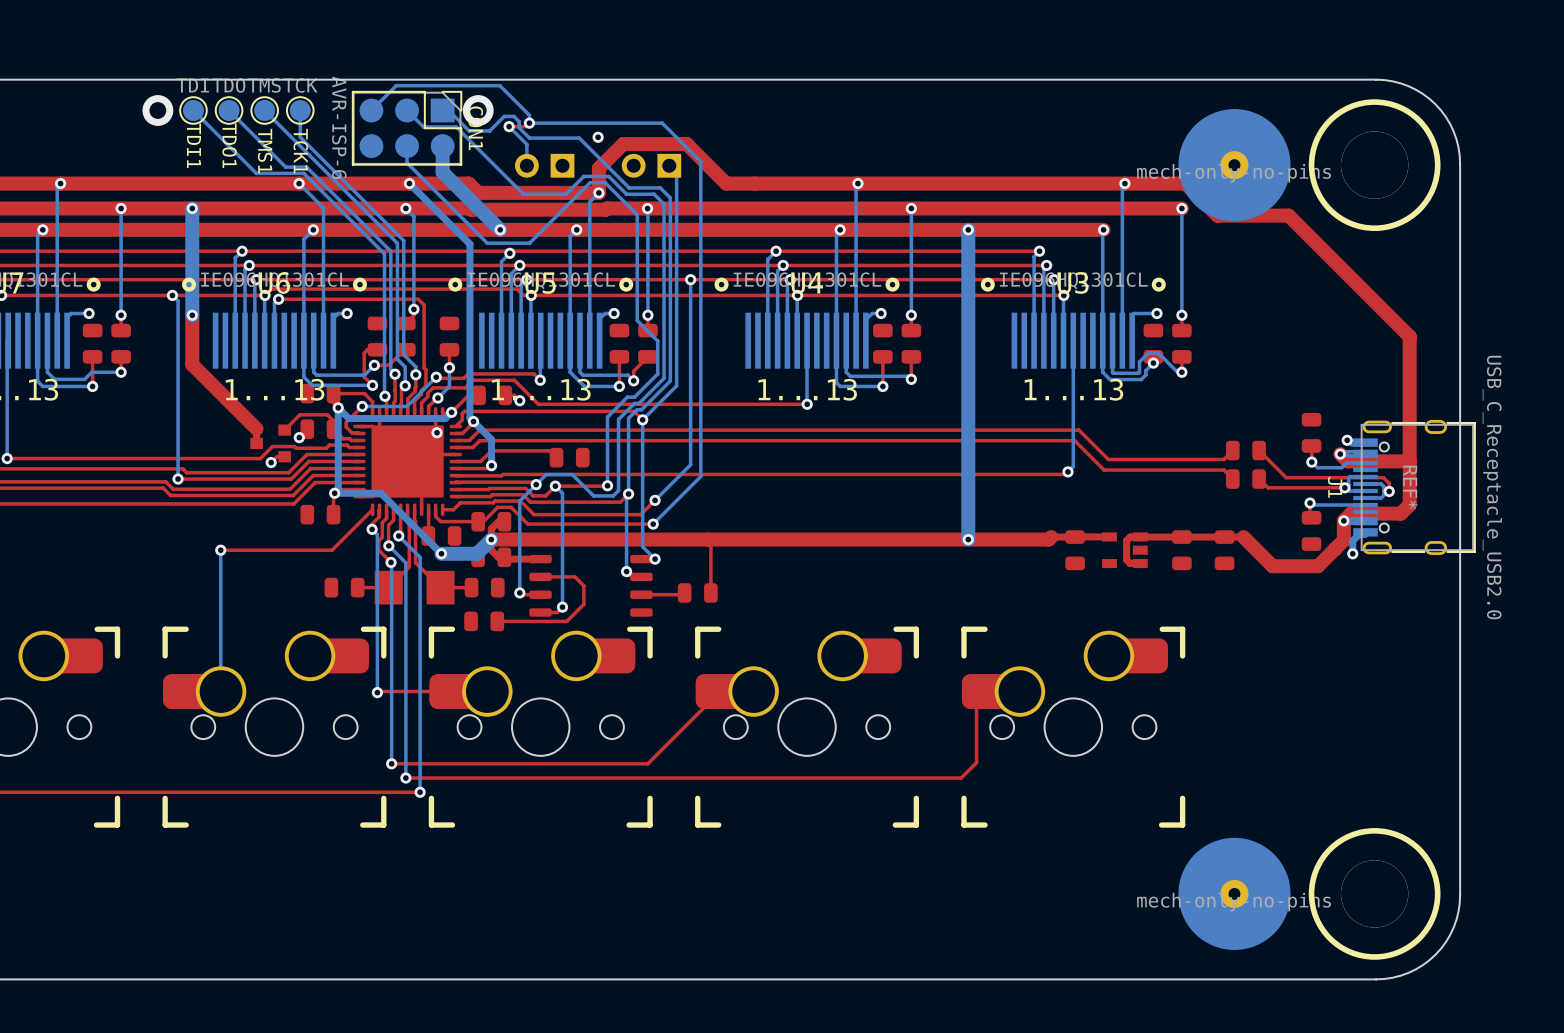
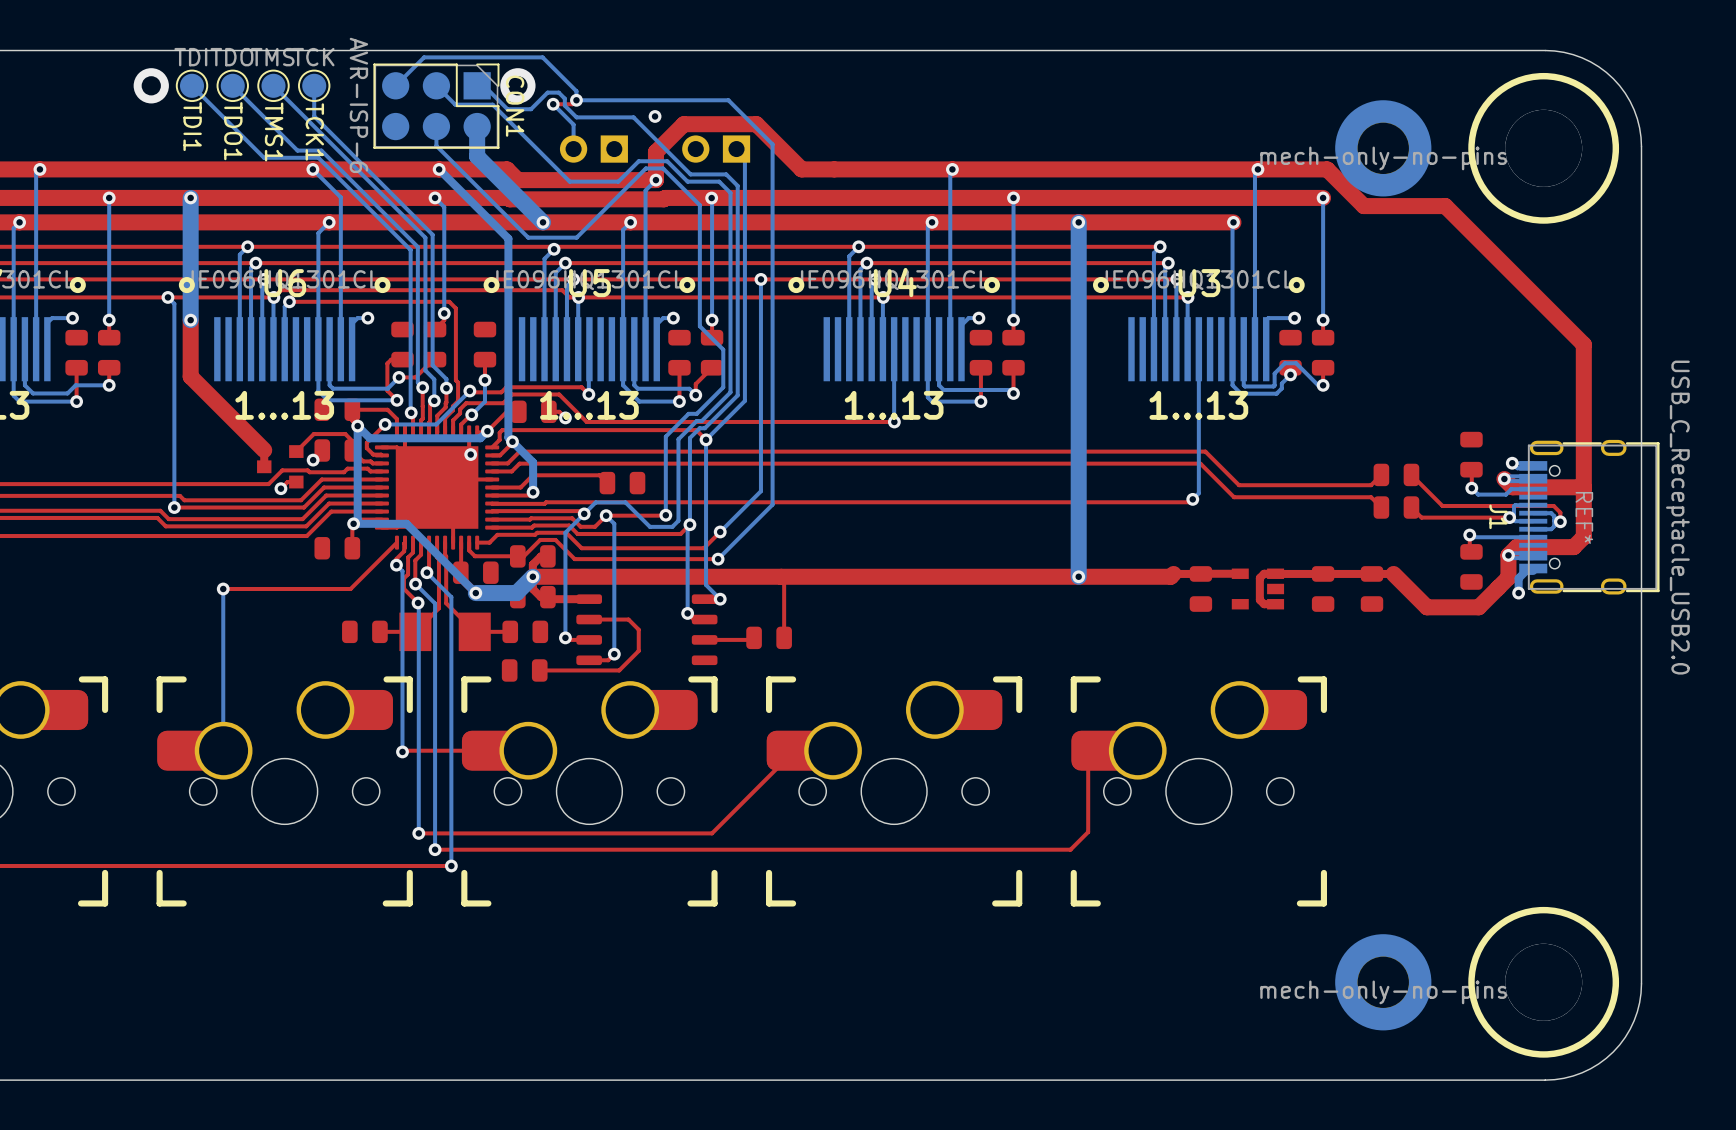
part footprint: [1178, 109, 1291, 222] -> [1335, 100, 1432, 197]
part footprint: [1178, 837, 1291, 950] -> [1335, 934, 1432, 1031]

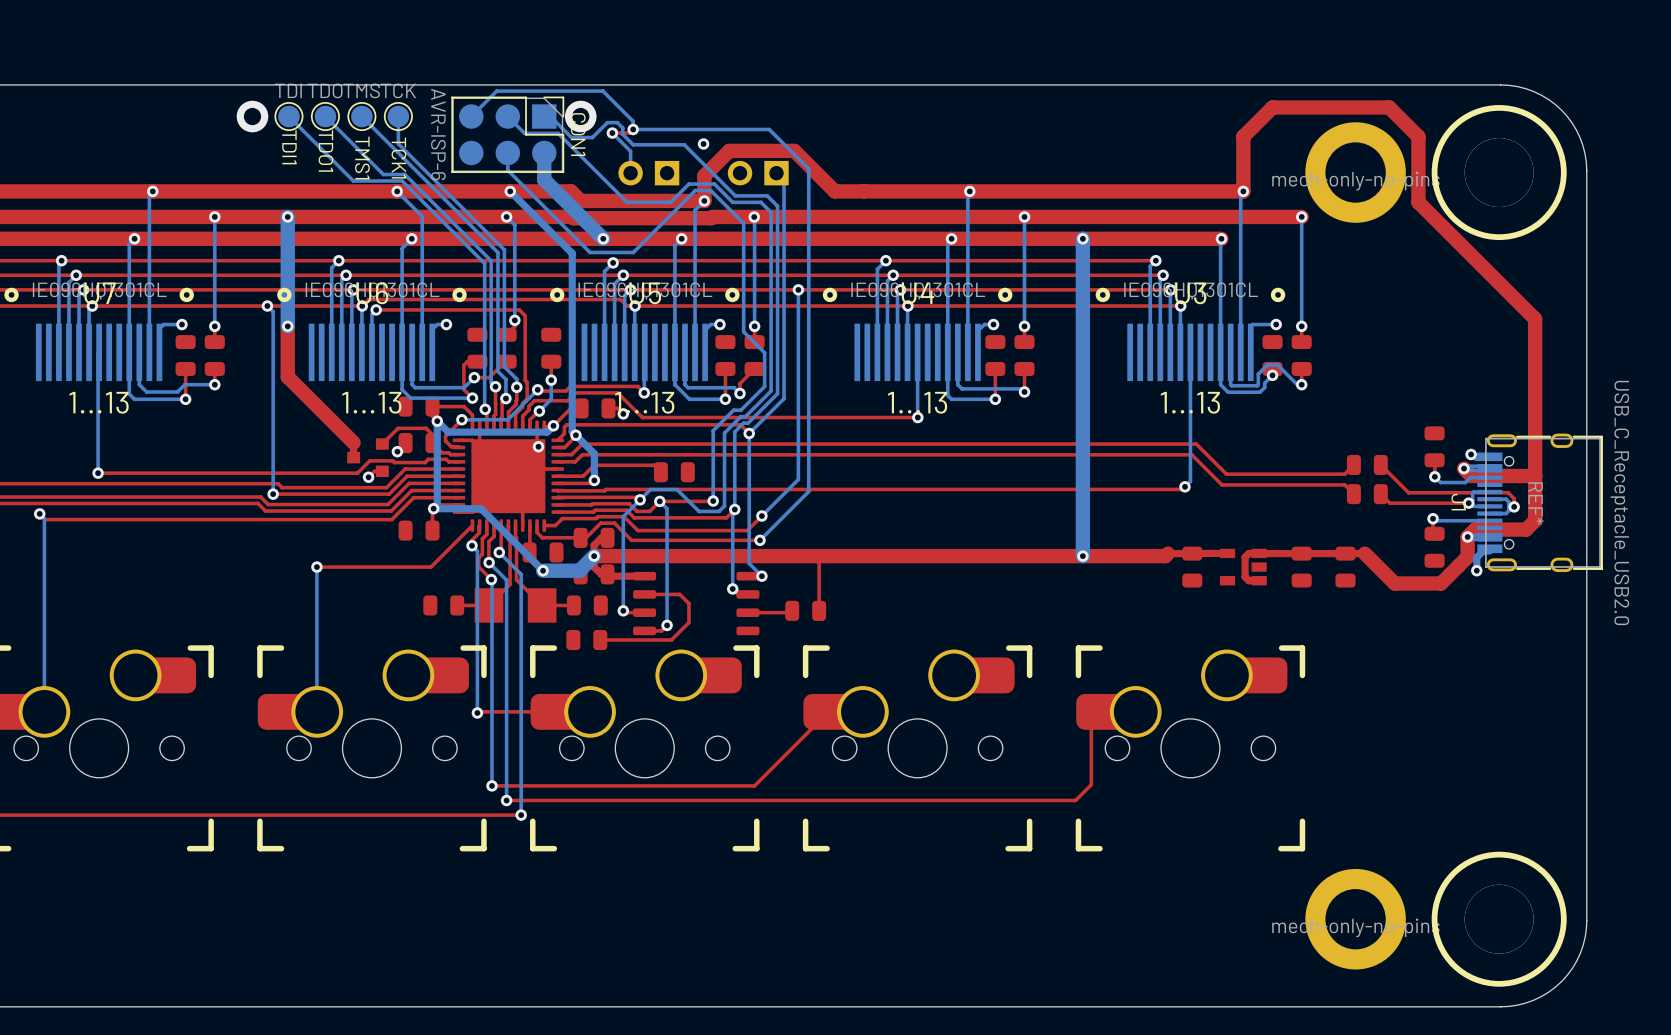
part footprint: [1335, 100, 1432, 197] -> [1305, 122, 1406, 223]
top track: (1257, 169) (1327, 169) (1363, 206) (1445, 206) (1583, 344) -> (1243, 191) (1243, 136) (1272, 107) (1389, 107) (1418, 136) (1418, 202) (1535, 319) (1535, 348)
part footprint: [1335, 934, 1432, 1031] -> [1305, 868, 1406, 970]

